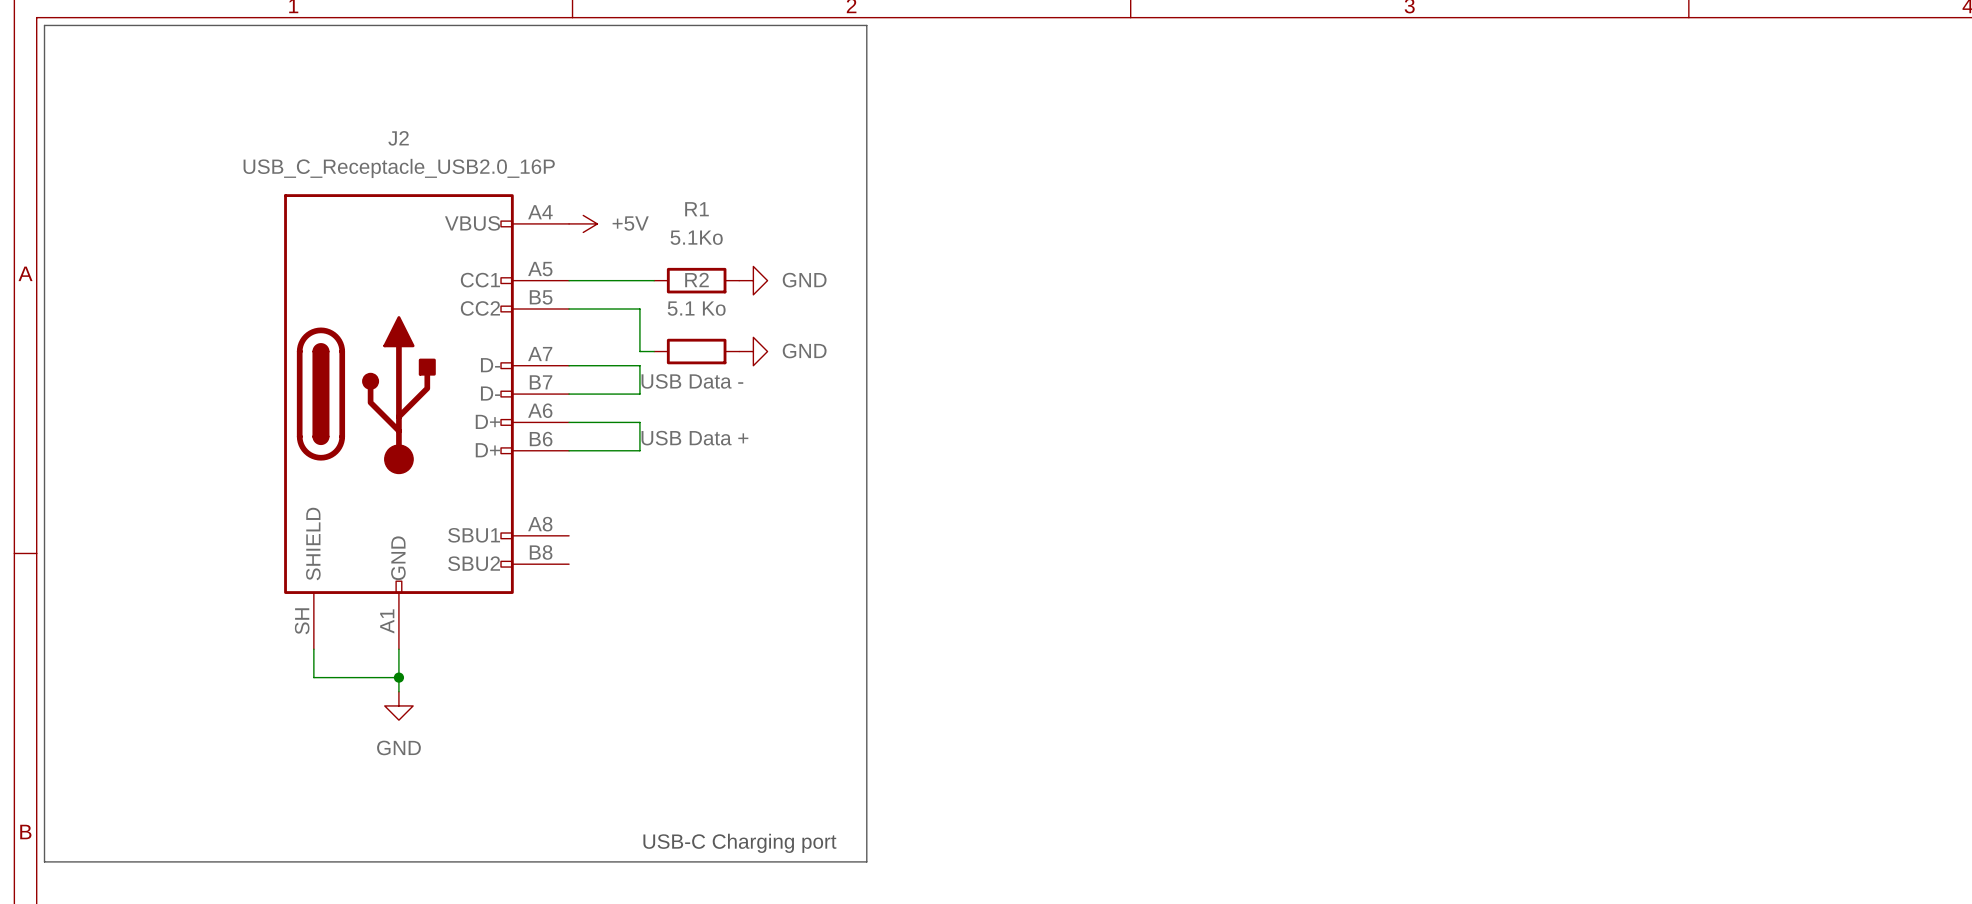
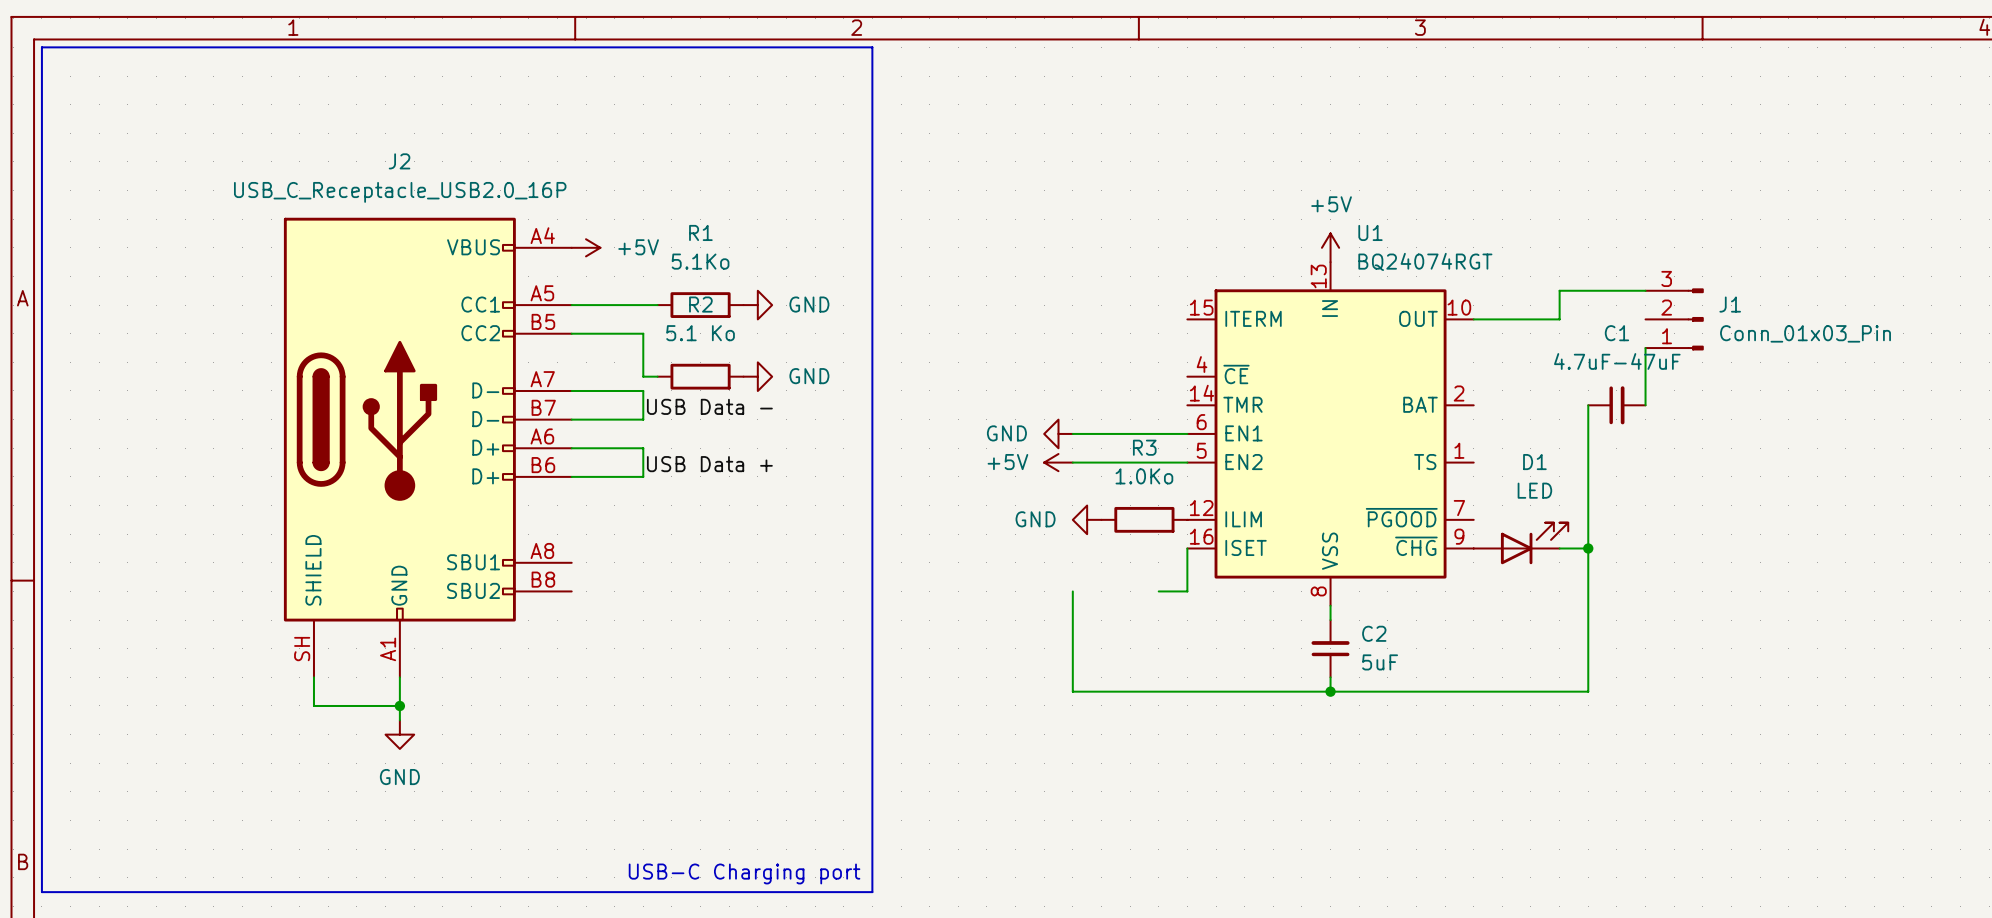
power symbol: none -> +5V (1330, 247)
wire: none -> (1645, 290) (1559, 290) (1559, 319) (1473, 319)
J1: none -> Conn_01x03_Pin (1674, 319)
wire: none -> (1645, 348) (1645, 405)
wire: none -> (1588, 405) (1588, 691) (1072, 691) (1072, 591)
C1: none -> 4.7uF-47uF (1616, 405)
power symbol: none -> GND (1058, 433)
wire: none -> (1072, 433) (1187, 433)
U1: none -> BQ24074RGT (1330, 433)
power symbol: none -> +5V (1058, 462)
wire: none -> (1072, 462) (1187, 462)
power symbol: none -> GND (1087, 519)
R3: none -> 1.0Ko (1144, 519)
D1: none -> LED (1520, 543)
wire: none -> (1187, 548) (1187, 591) (1158, 591)
wire: none -> (1559, 548) (1588, 548)
junction: none -> (1588, 548)
wire: none -> (1330, 605) (1330, 620)
C2: none -> 5uF (1330, 648)
wire: none -> (1330, 677) (1330, 691)
junction: none -> (1330, 691)

